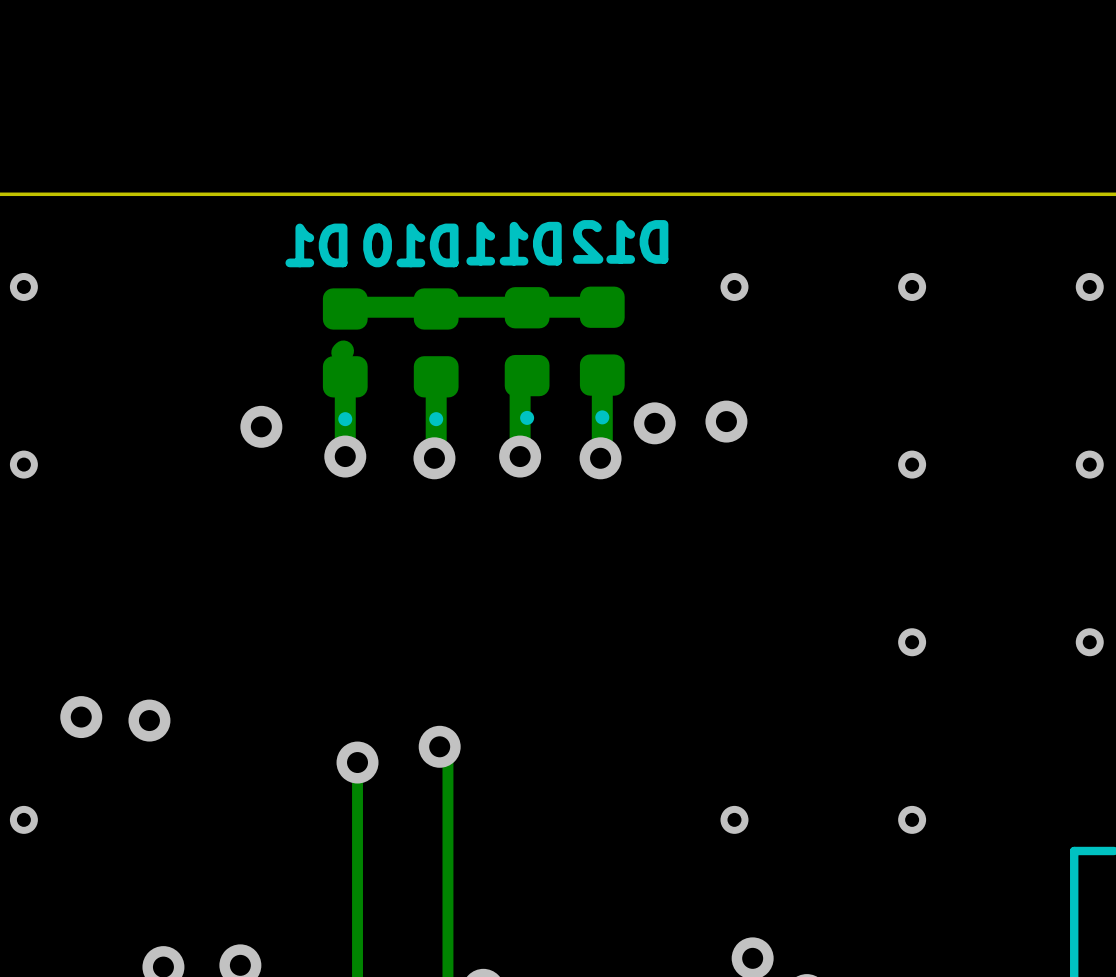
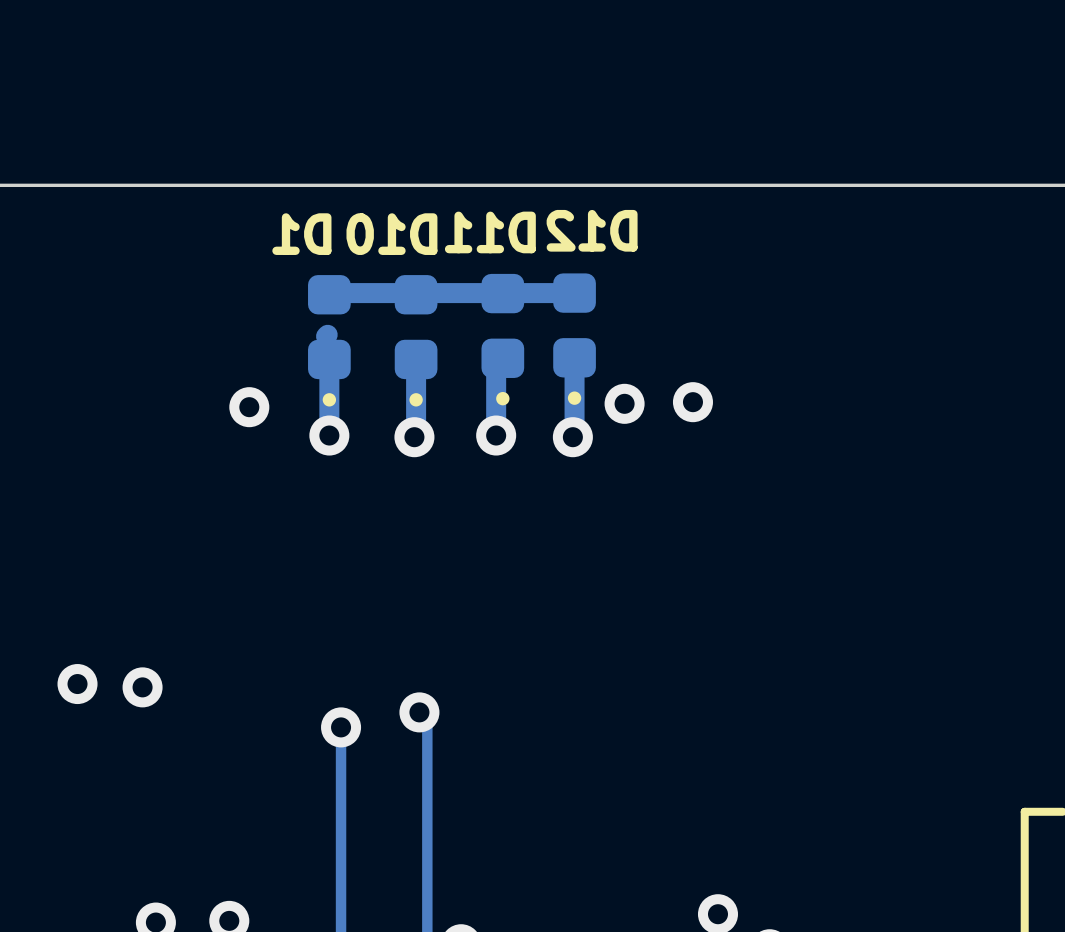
via: (23, 286) -> none
via: (734, 286) -> none
via: (912, 286) -> none
via: (1089, 286) -> none
via: (23, 464) -> none
via: (912, 464) -> none
via: (1089, 464) -> none
via: (912, 642) -> none
via: (1089, 642) -> none
via: (23, 819) -> none
via: (734, 819) -> none
via: (912, 819) -> none

